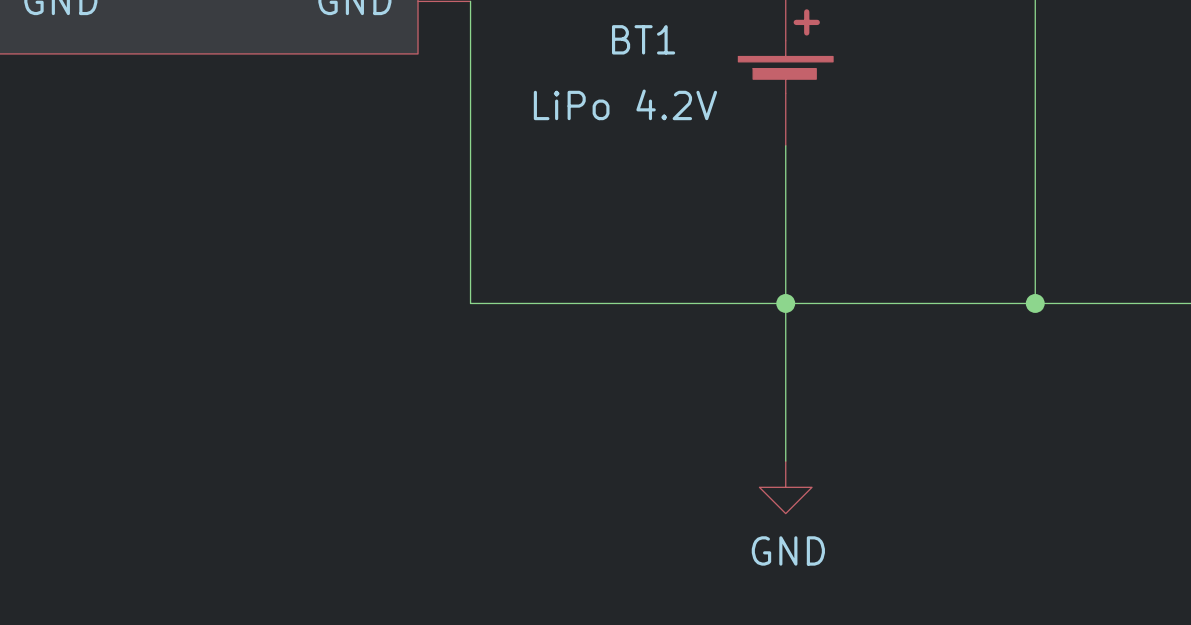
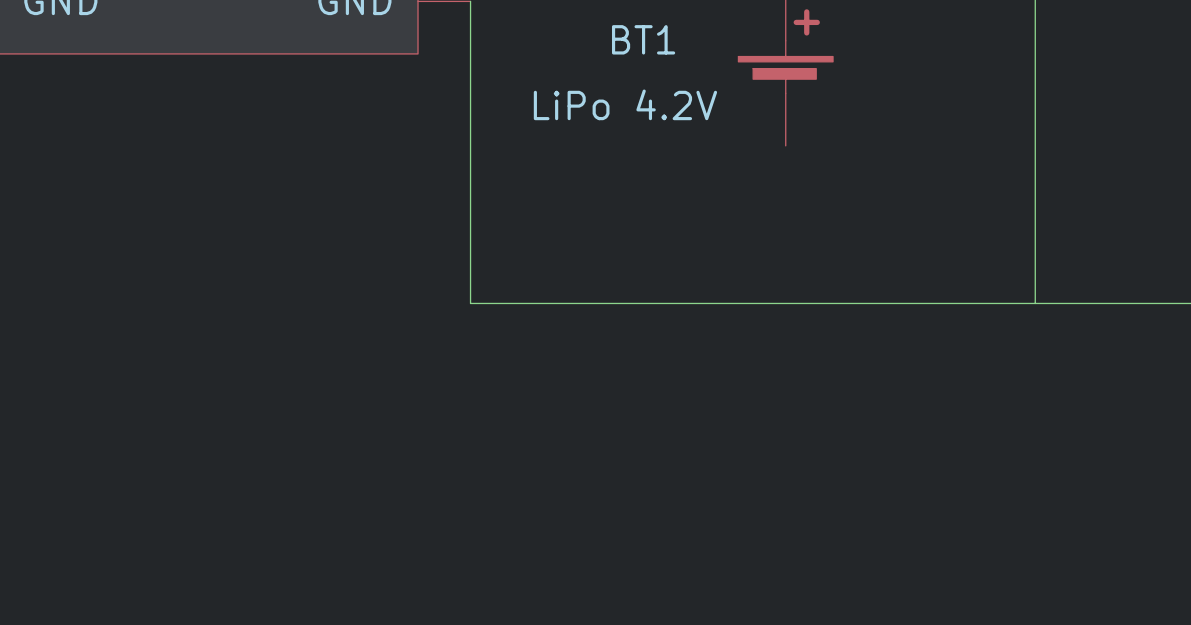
wire: (785, 145) (785, 461) -> none
junction: (785, 303) -> none
junction: (1035, 303) -> none
power symbol: GND (785, 487) -> none

